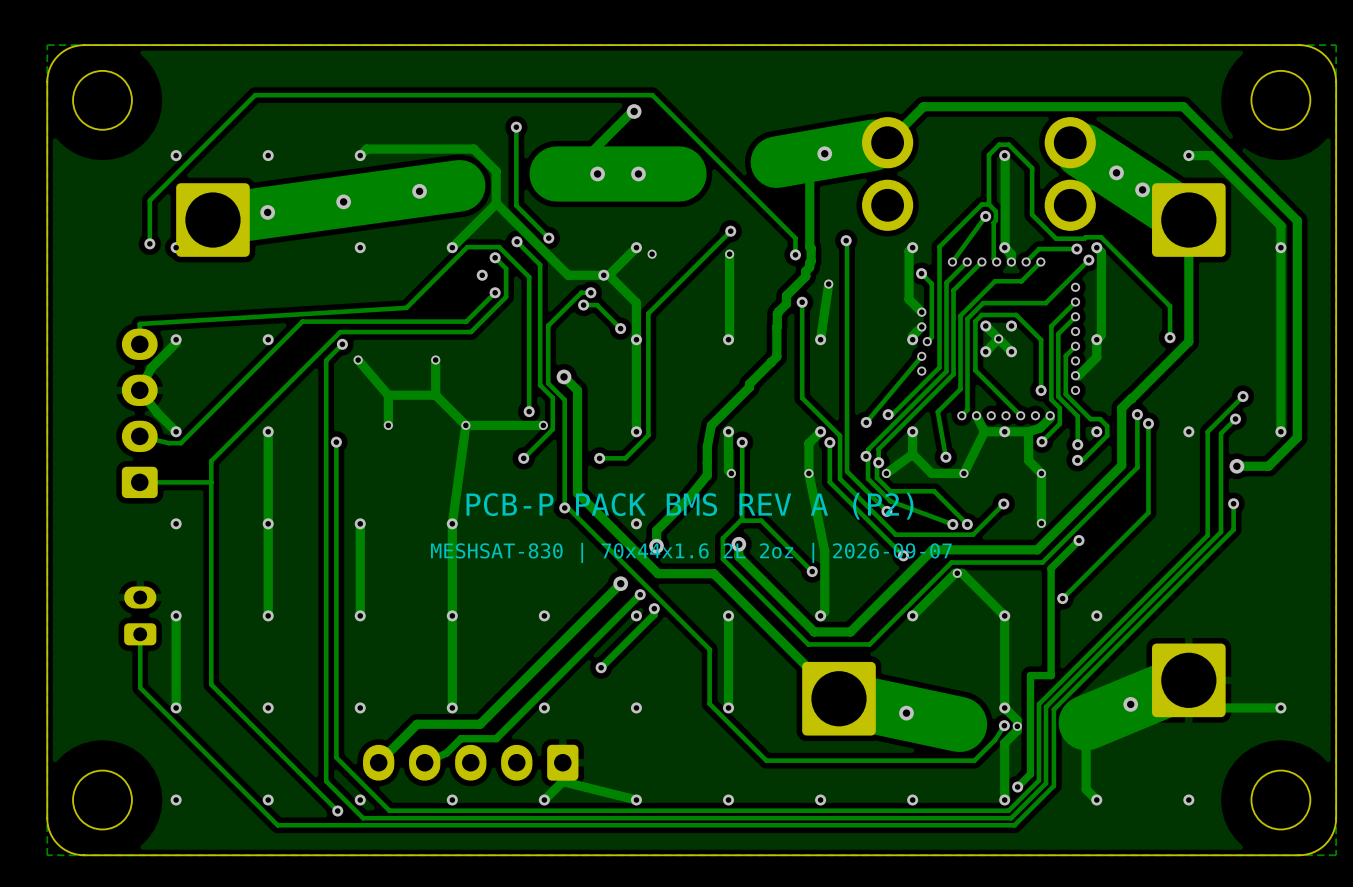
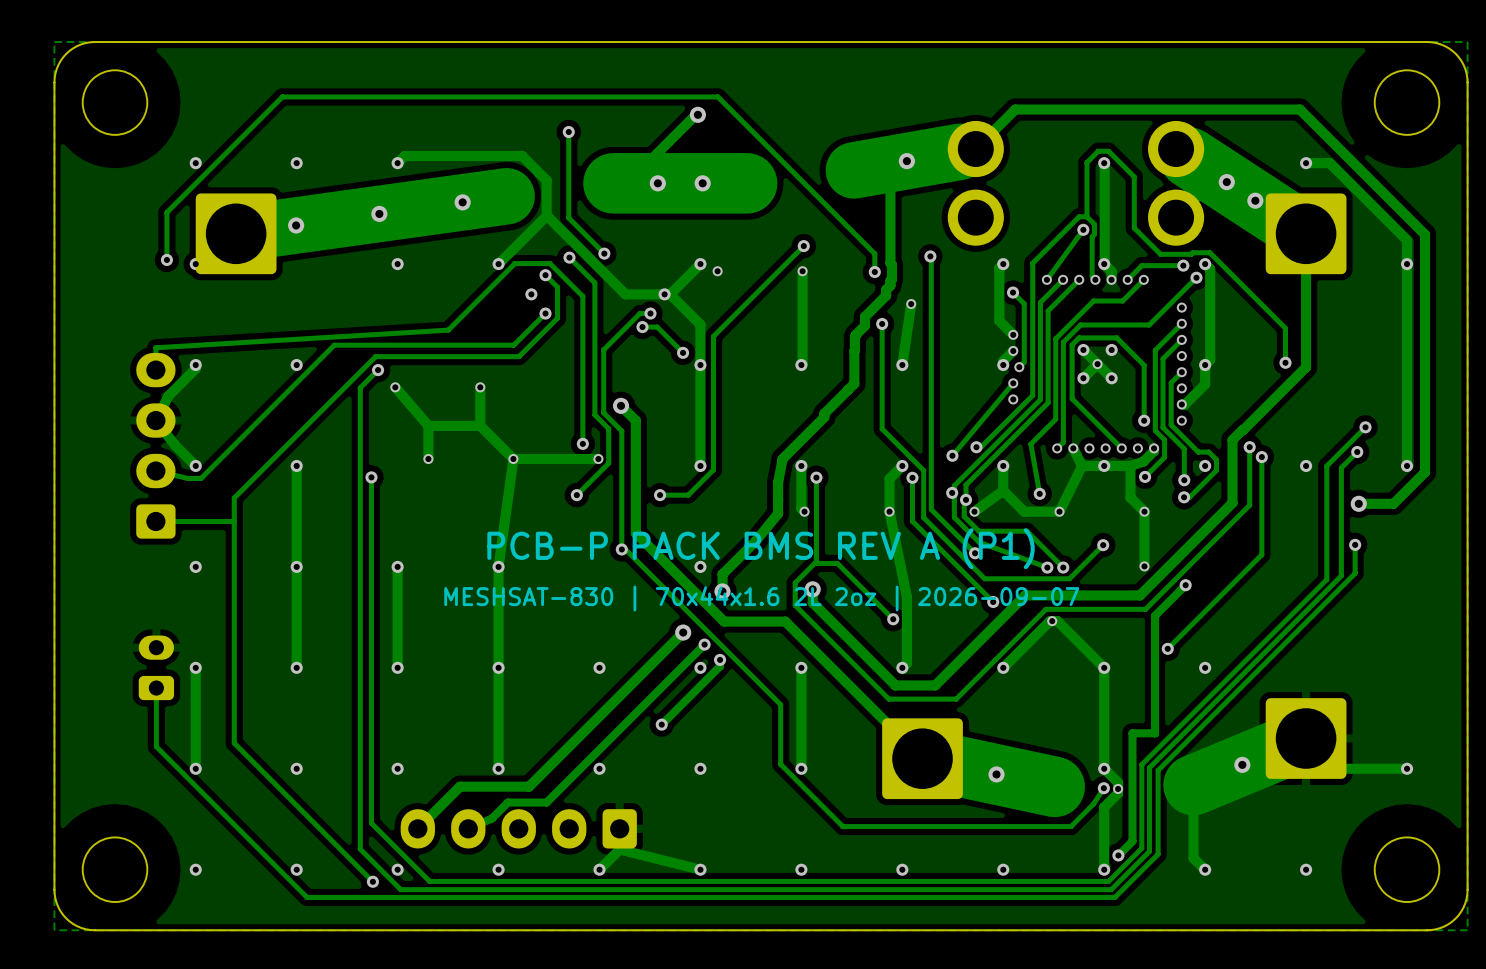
text: PCB-P PACK BMS REV A (P2) (690, 506) -> PCB-P PACK BMS REV A (P1) (761, 548)

